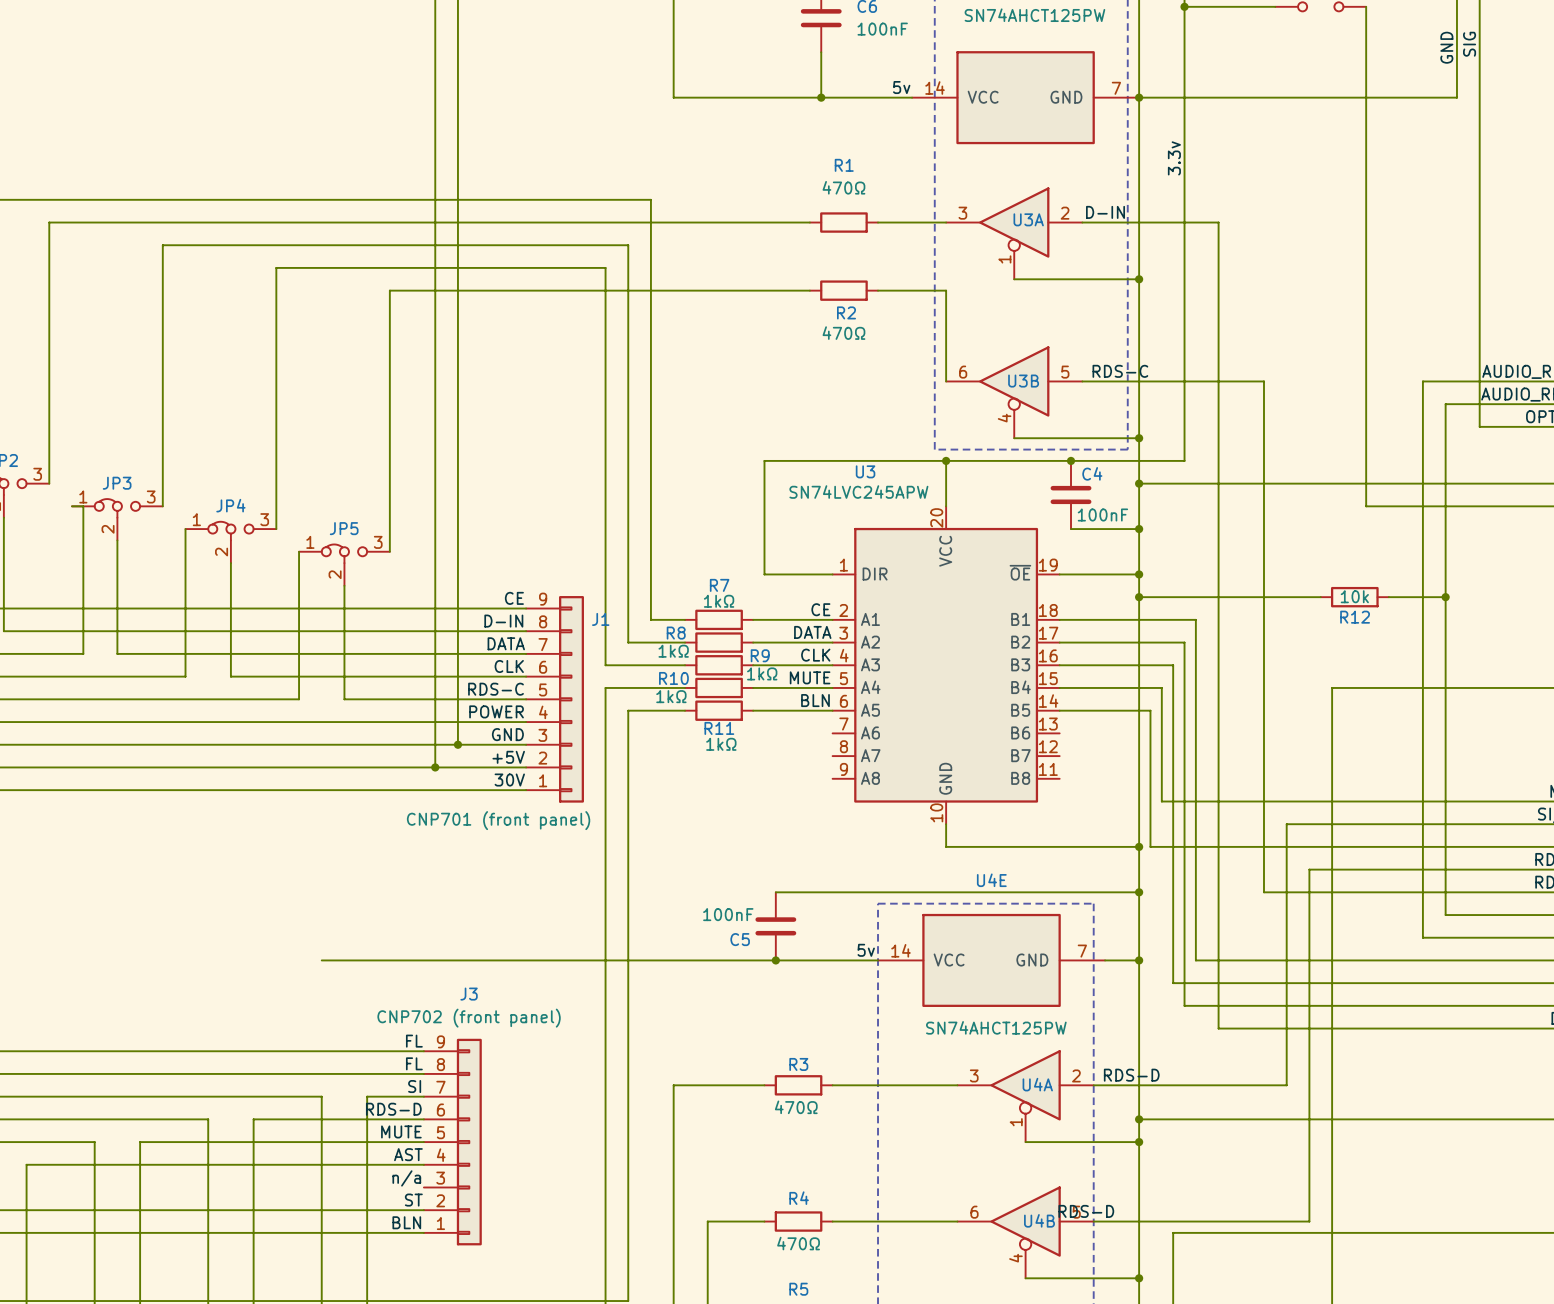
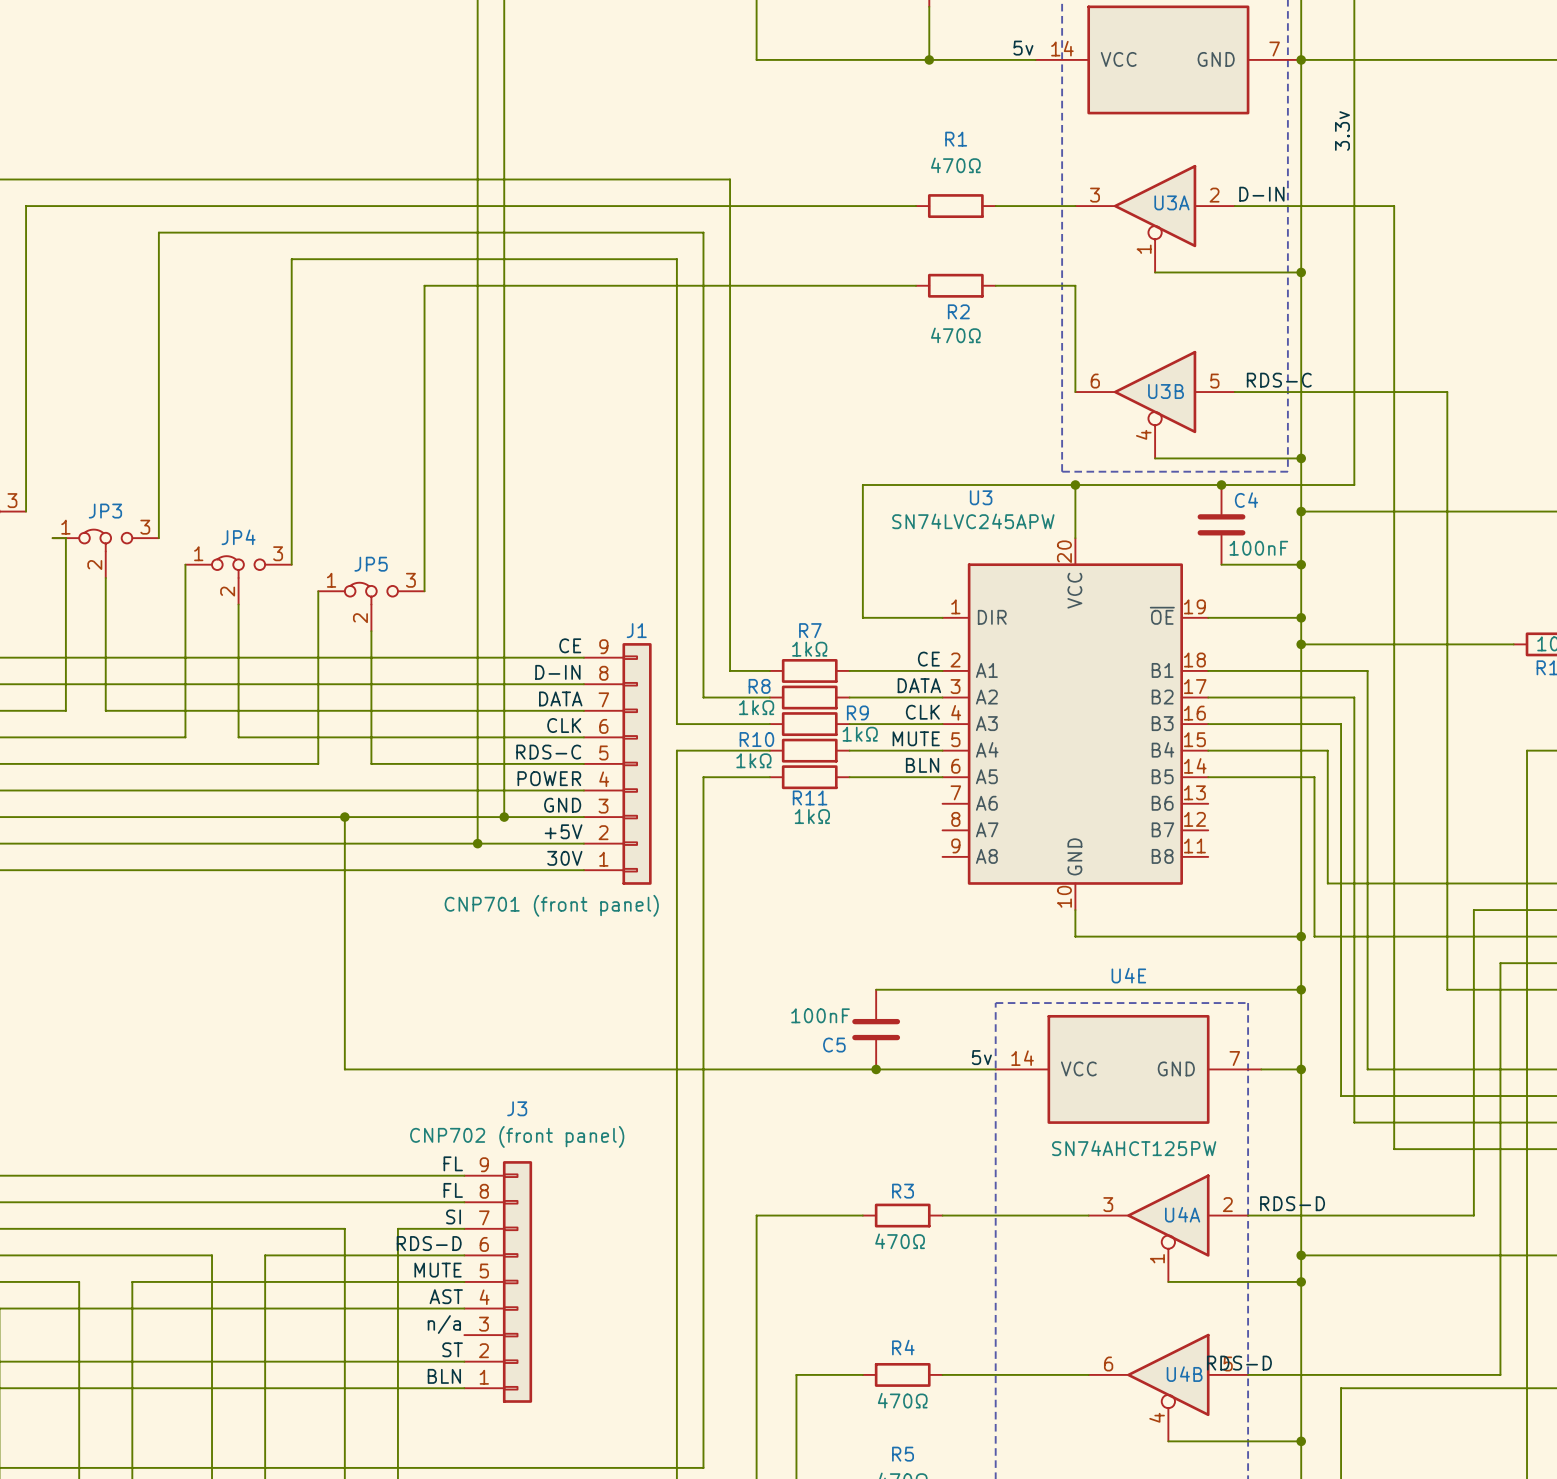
J1 name position: J1 (600, 619) -> J1 (636, 630)
wire: none -> (344, 817) (344, 1069)
junction: none -> (344, 817)

